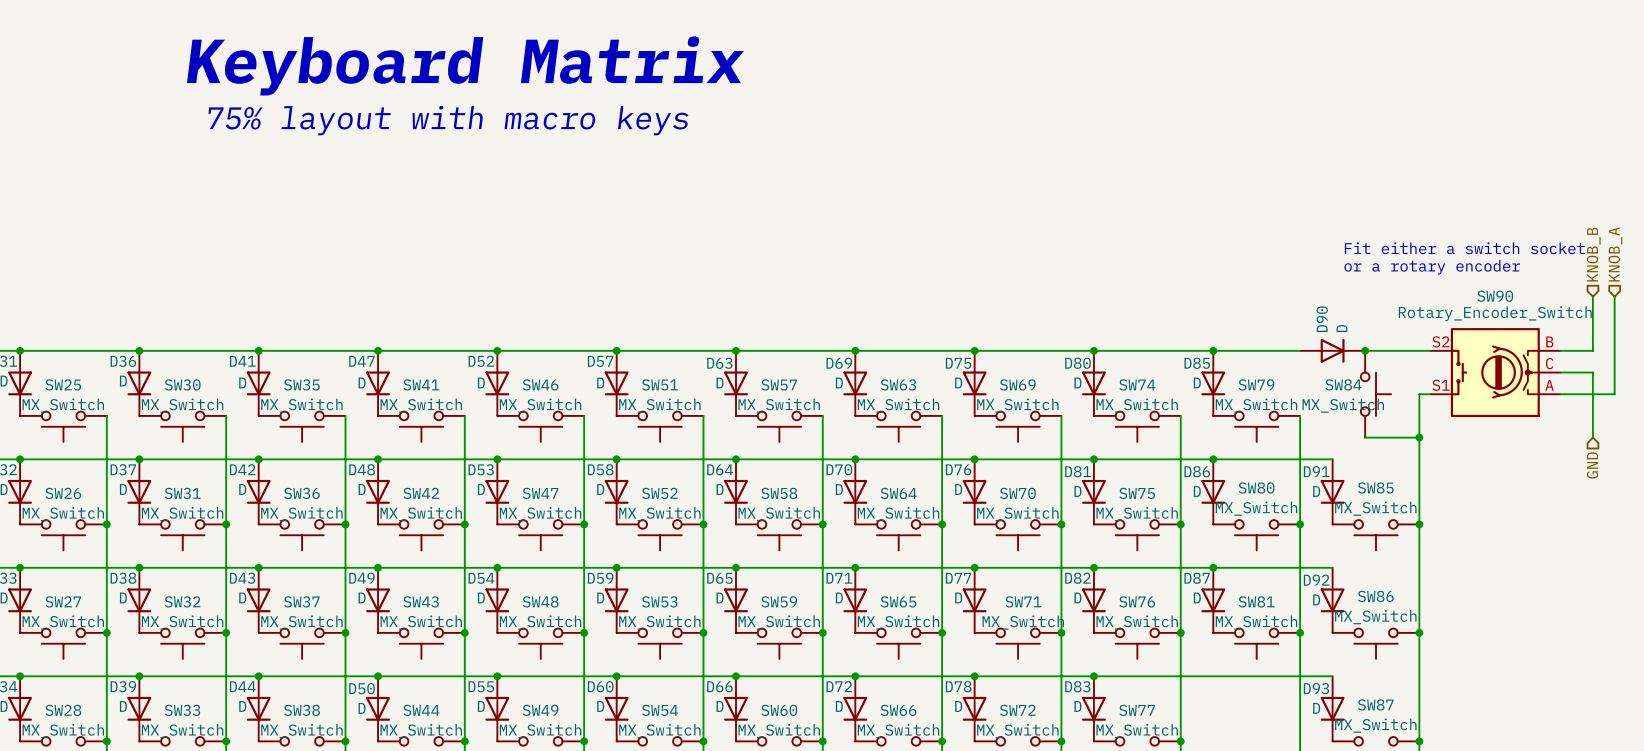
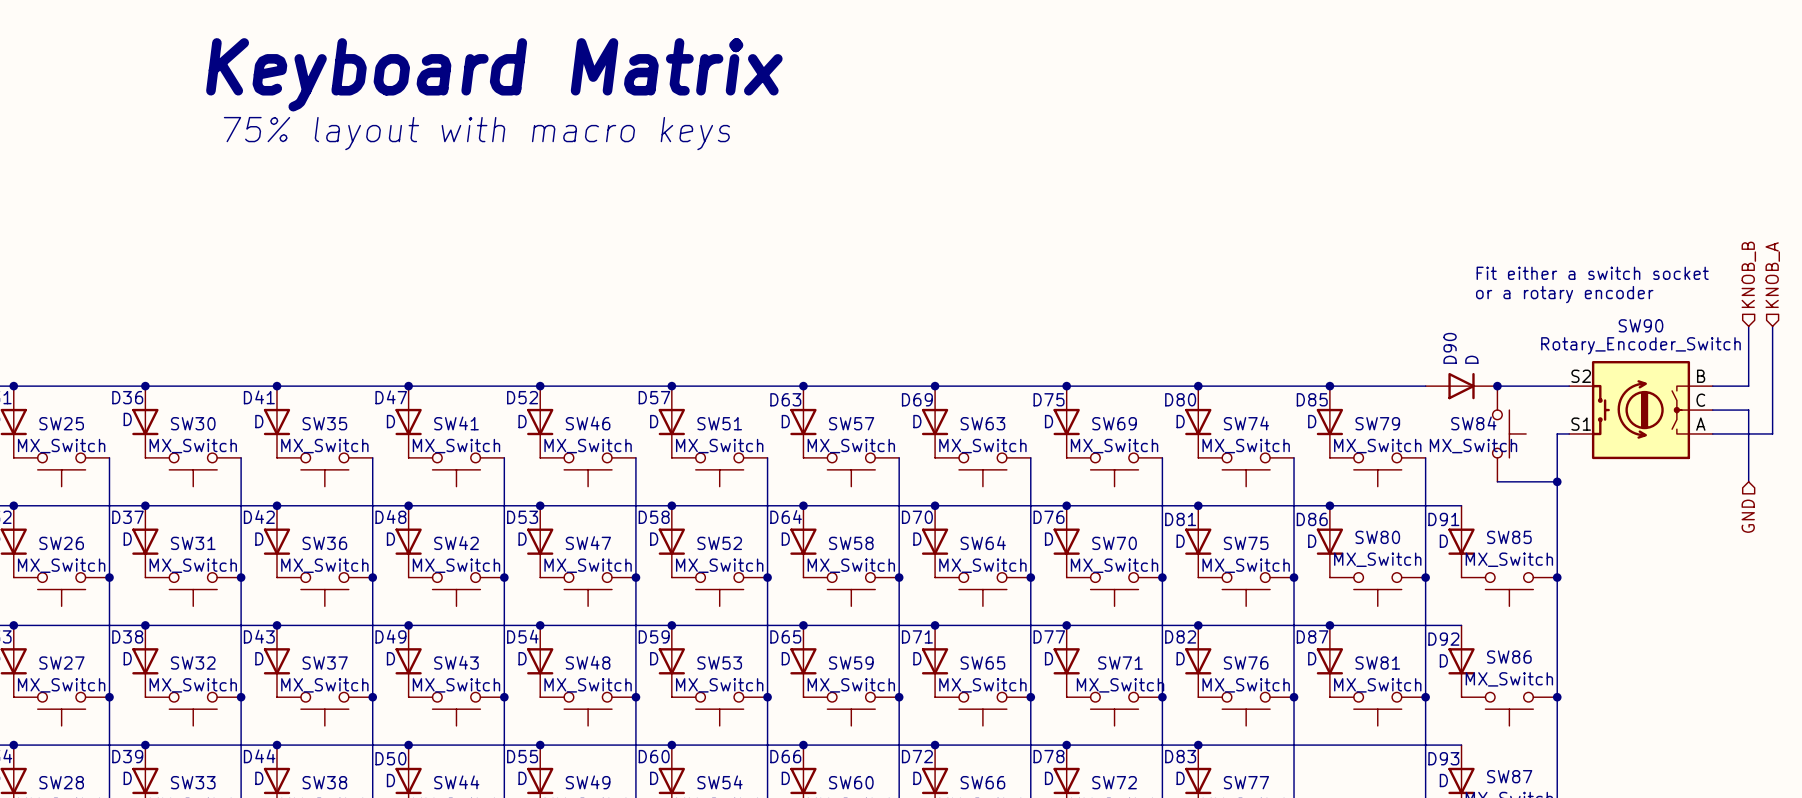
SW90 symbol: [1430, 328, 1561, 418] -> [1569, 360, 1713, 460]

